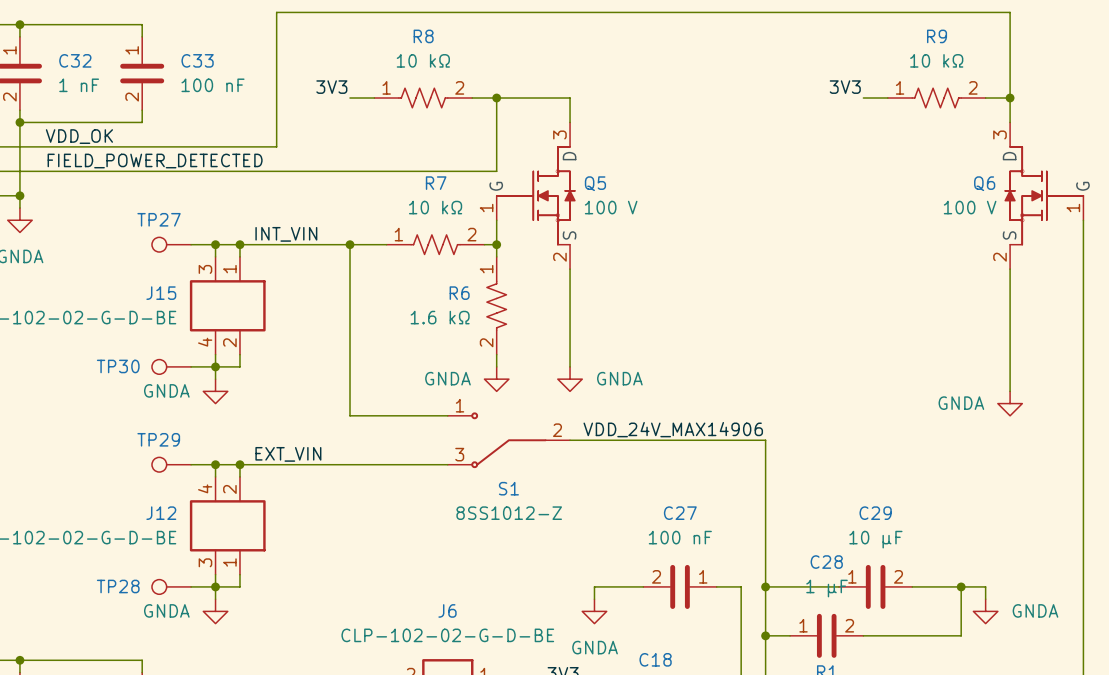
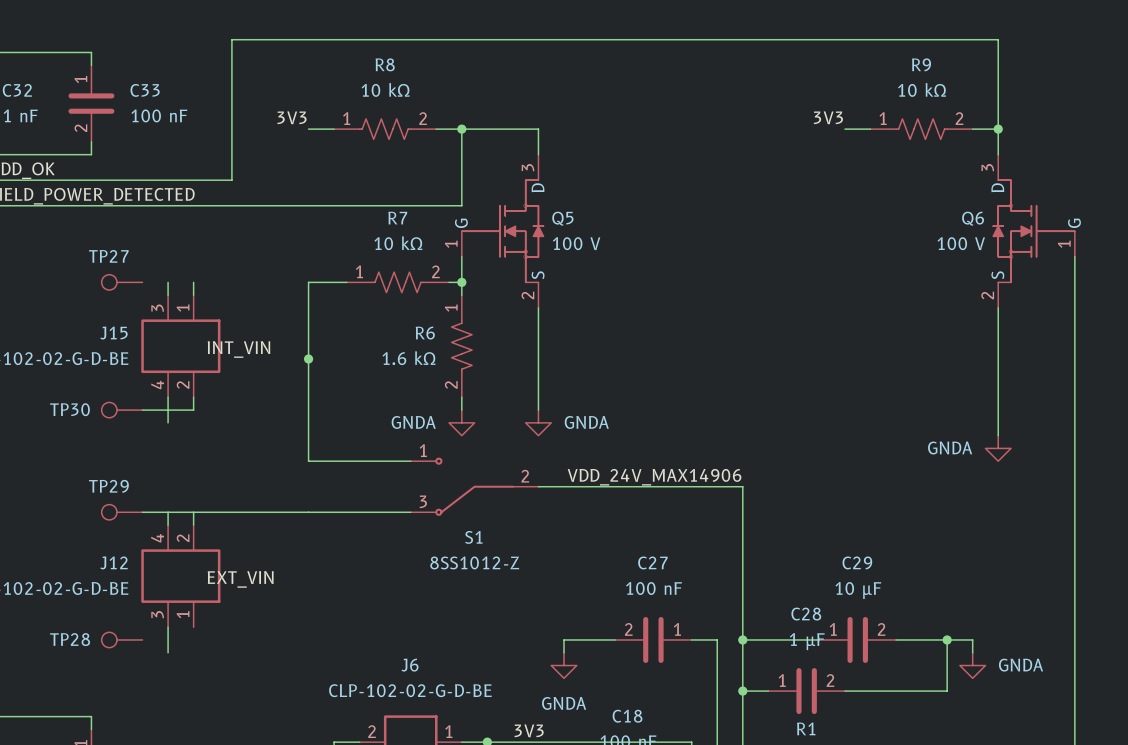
label position: INT_VIN (286, 234) -> INT_VIN (238, 349)
wire: (191, 244) (350, 244) -> none
junction: (215, 244) -> none
junction: (239, 244) -> none
junction: (350, 244) -> none
junction: none -> (308, 359)
junction: (215, 366) -> none
power symbol: GNDA (215, 391) -> none
label position: EXT_VIN (288, 454) -> EXT_VIN (240, 579)
junction: (215, 464) -> none
junction: (239, 464) -> none
wire: (239, 574) (239, 586) (191, 586) -> none
junction: (215, 586) -> none
power symbol: GNDA (215, 611) -> none

